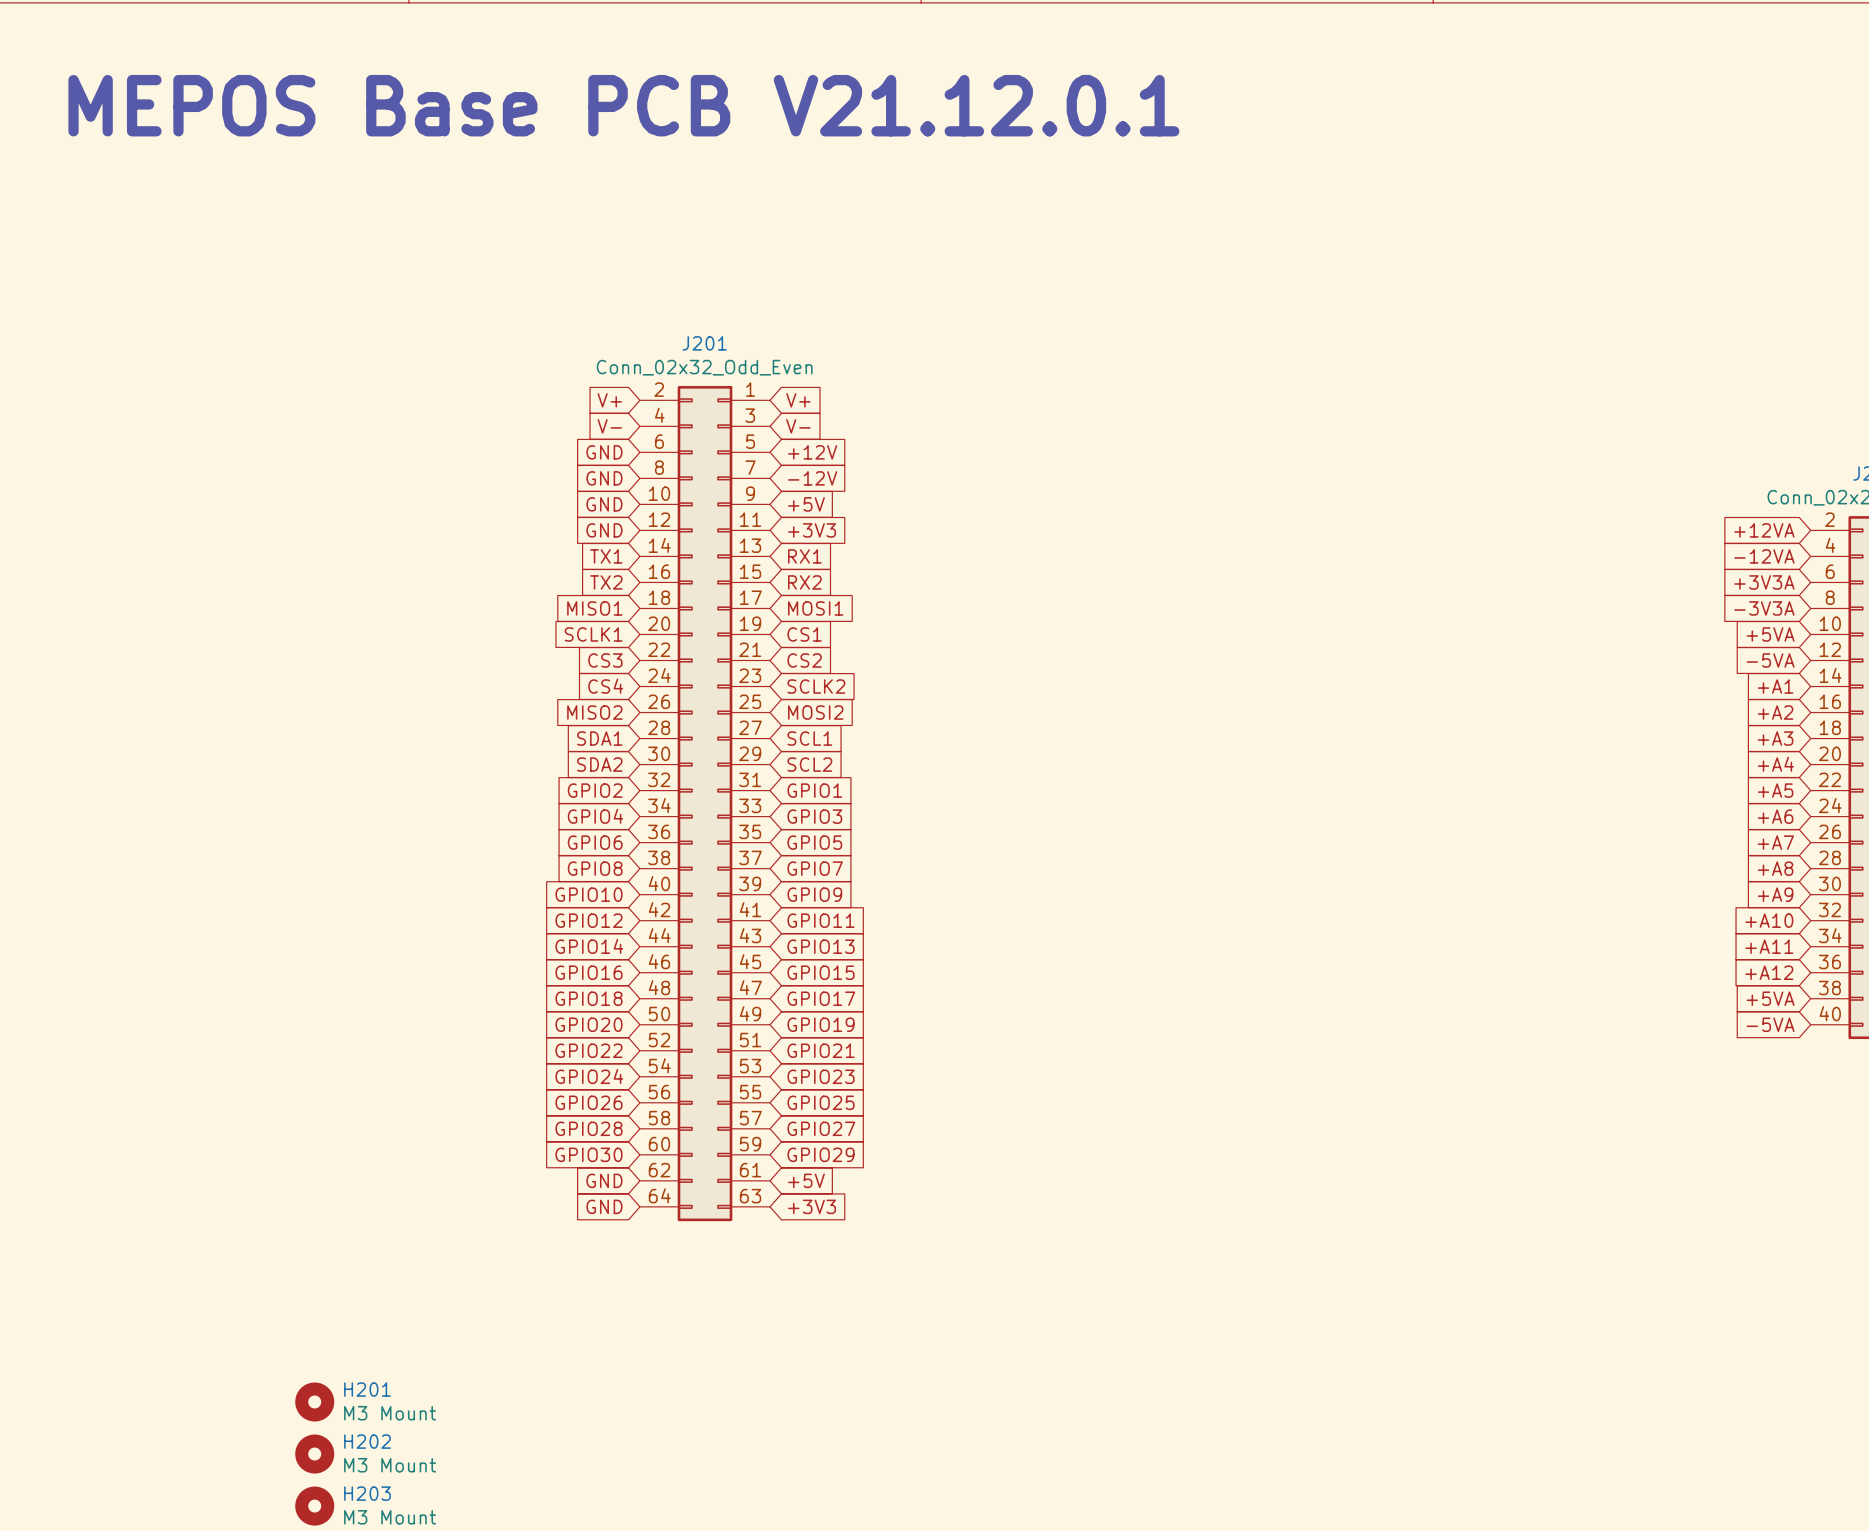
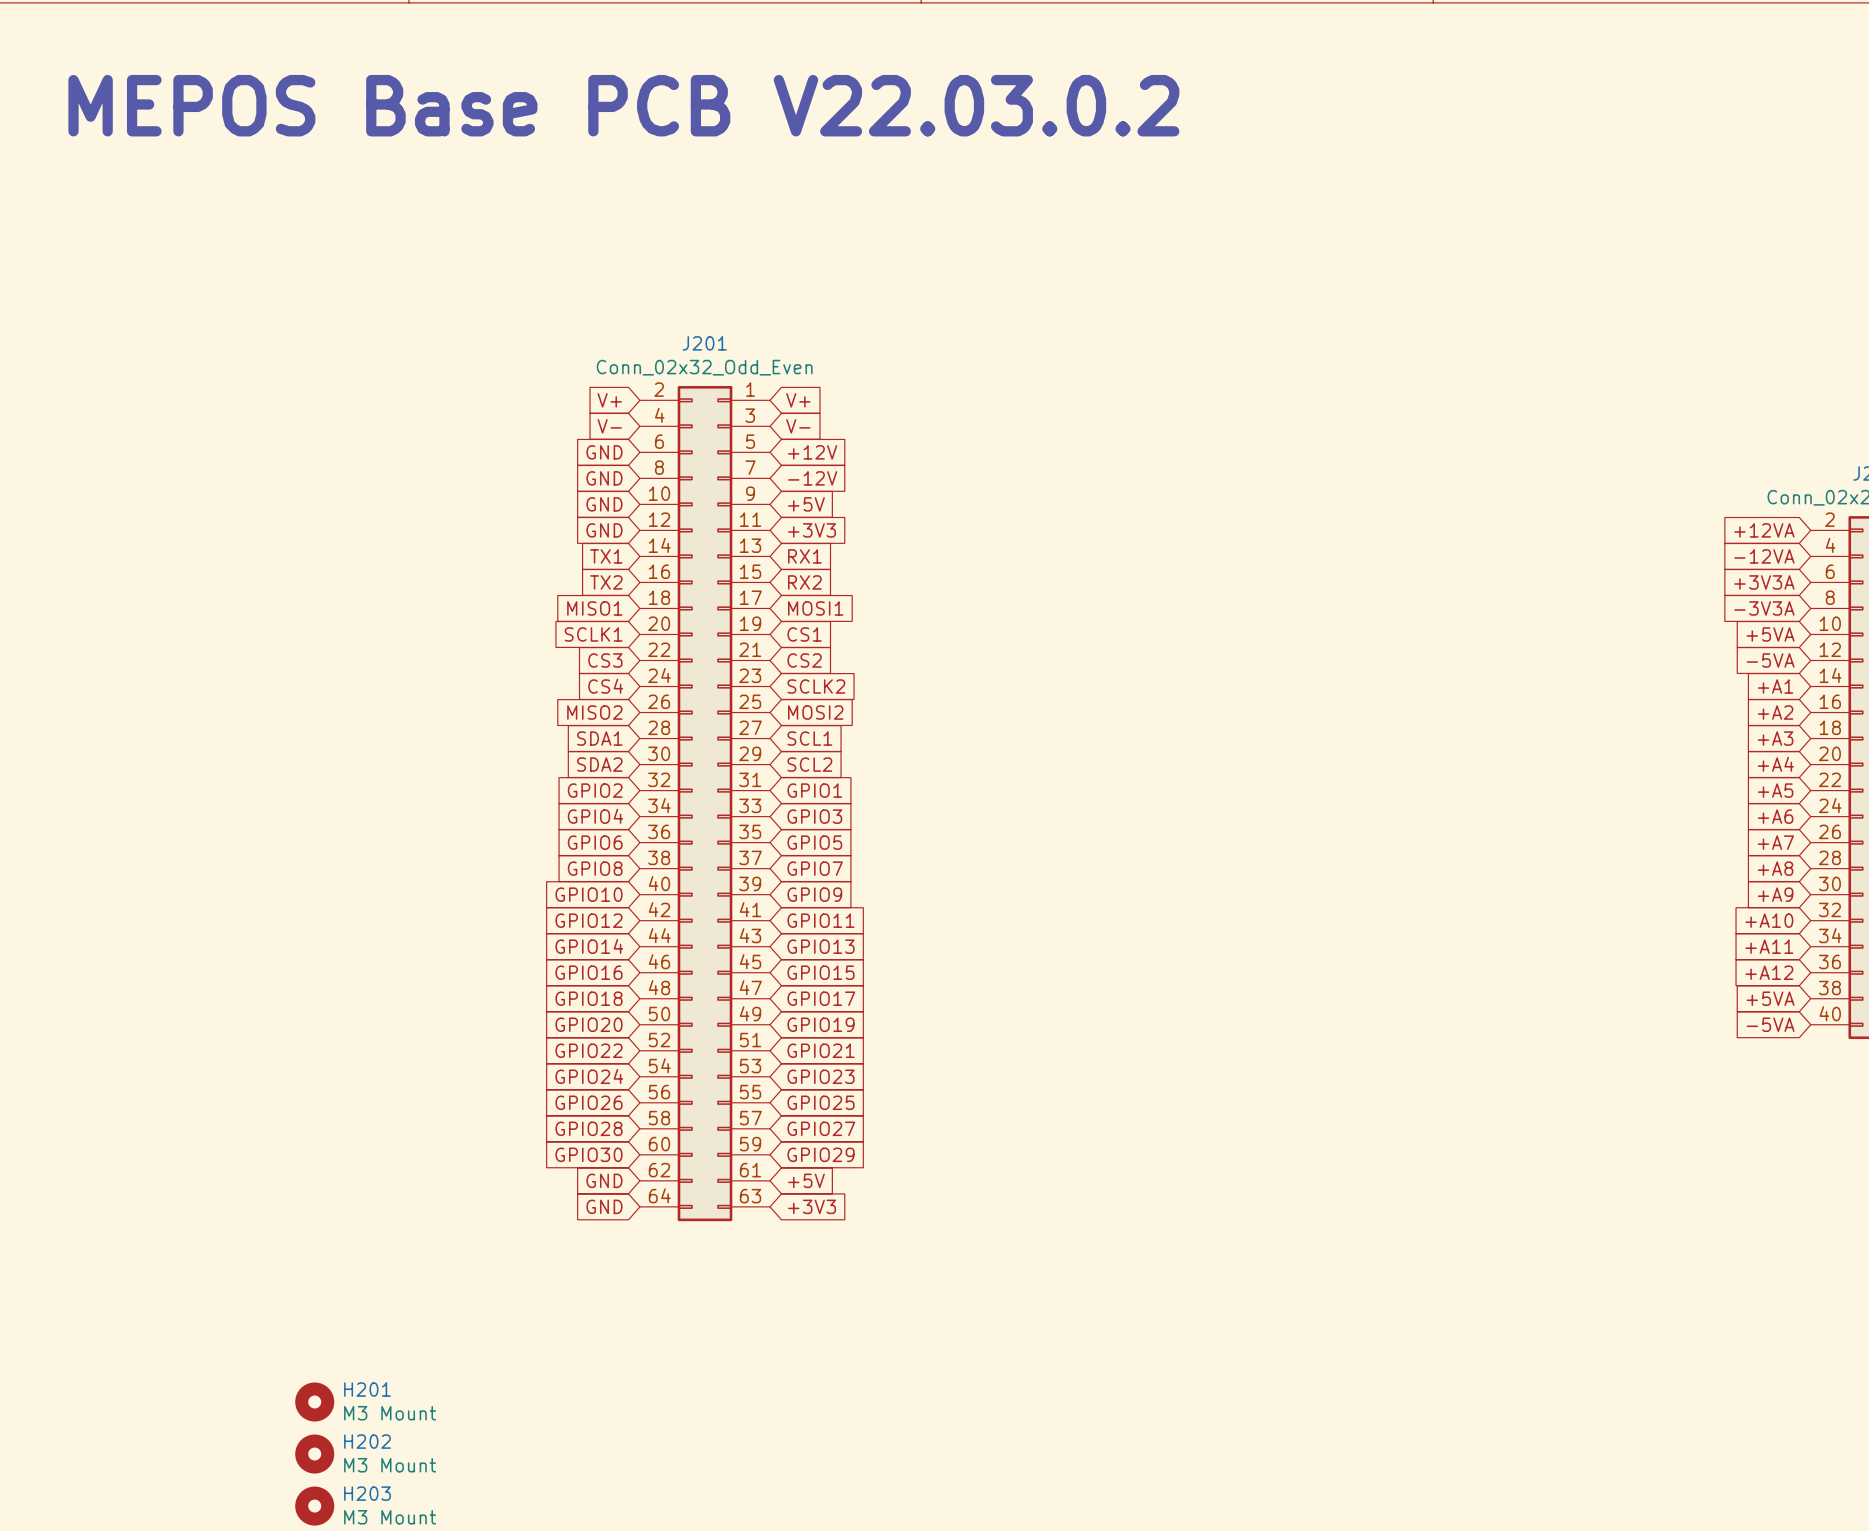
text: MEPOS Base PCB V21.12.0.1 (623, 105) -> MEPOS Base PCB V22.03.0.2 (623, 105)

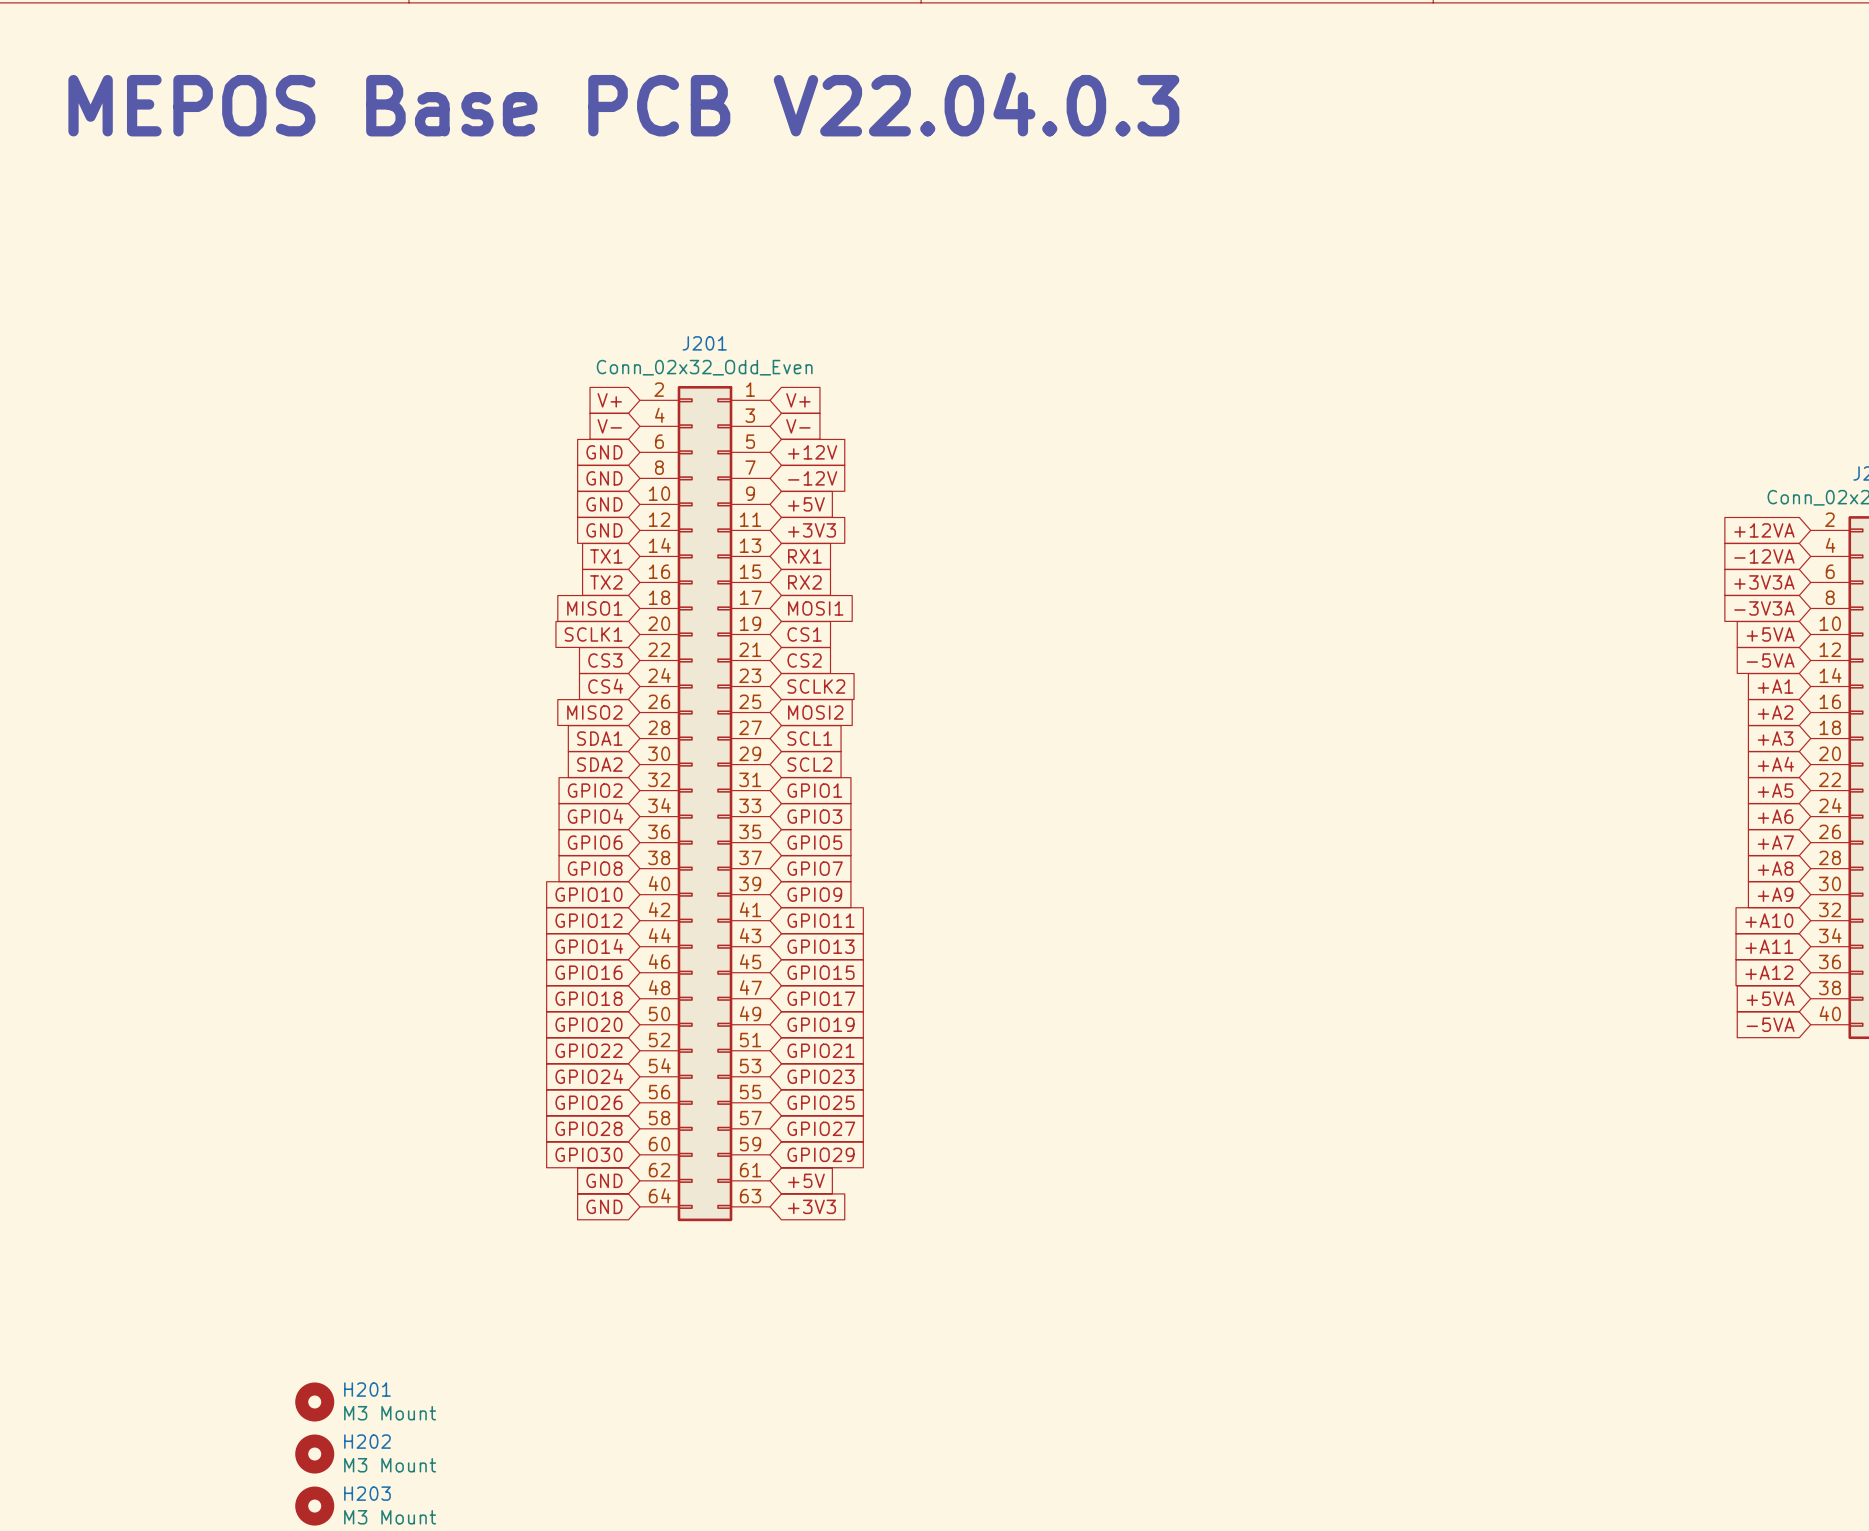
text: MEPOS Base PCB V22.03.0.2 (623, 105) -> MEPOS Base PCB V22.04.0.3 (623, 104)

